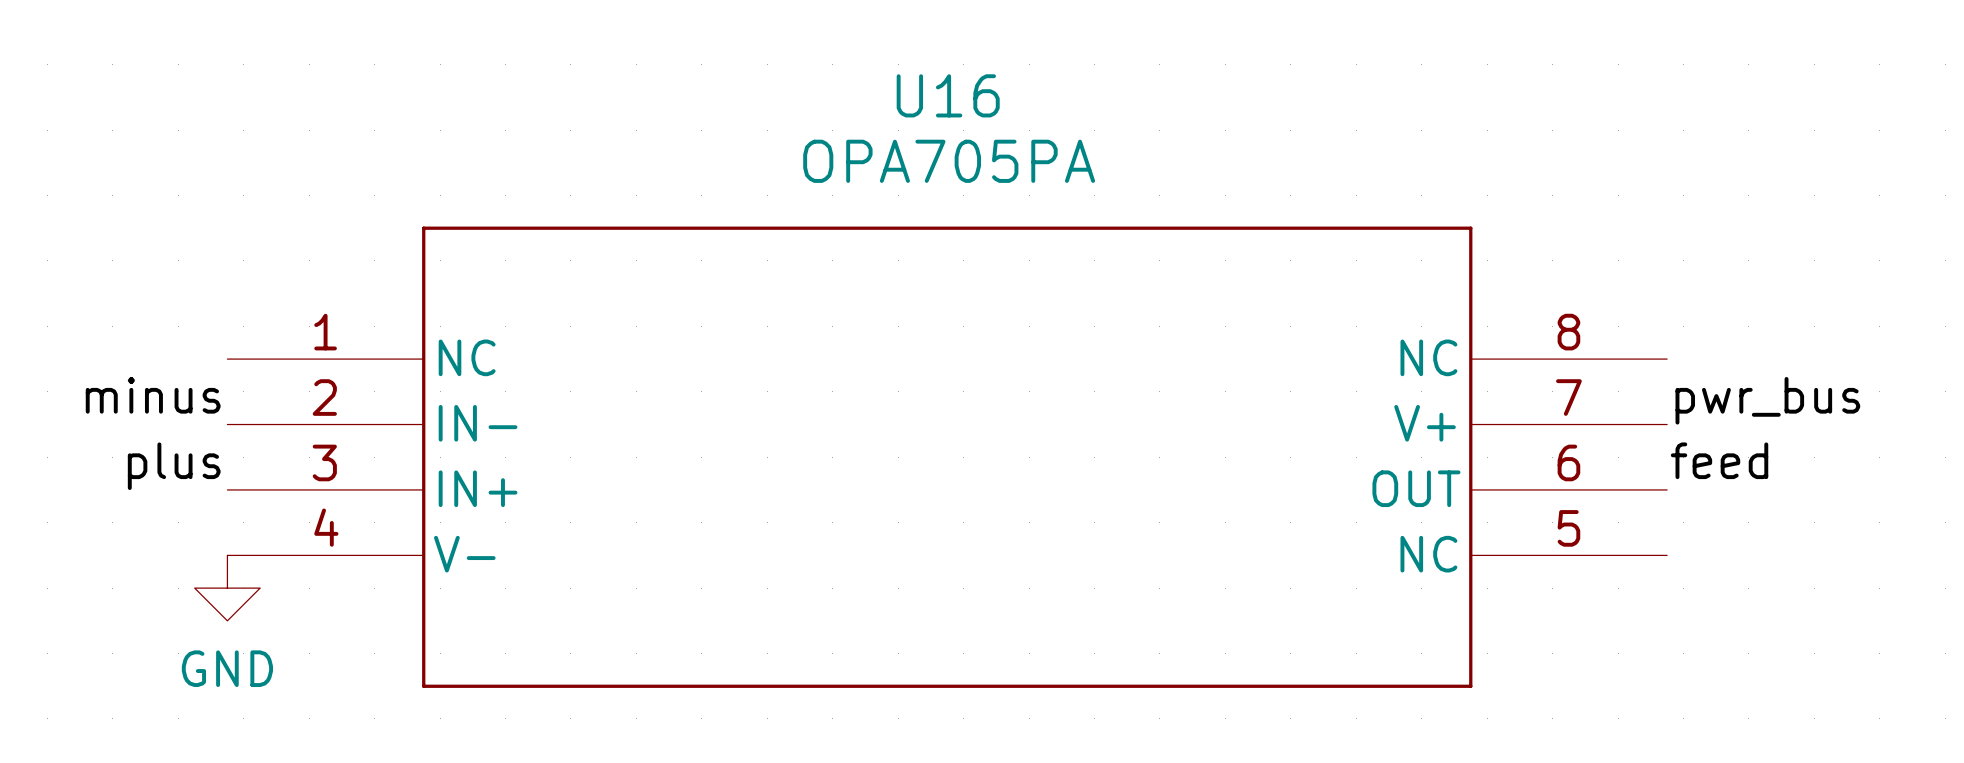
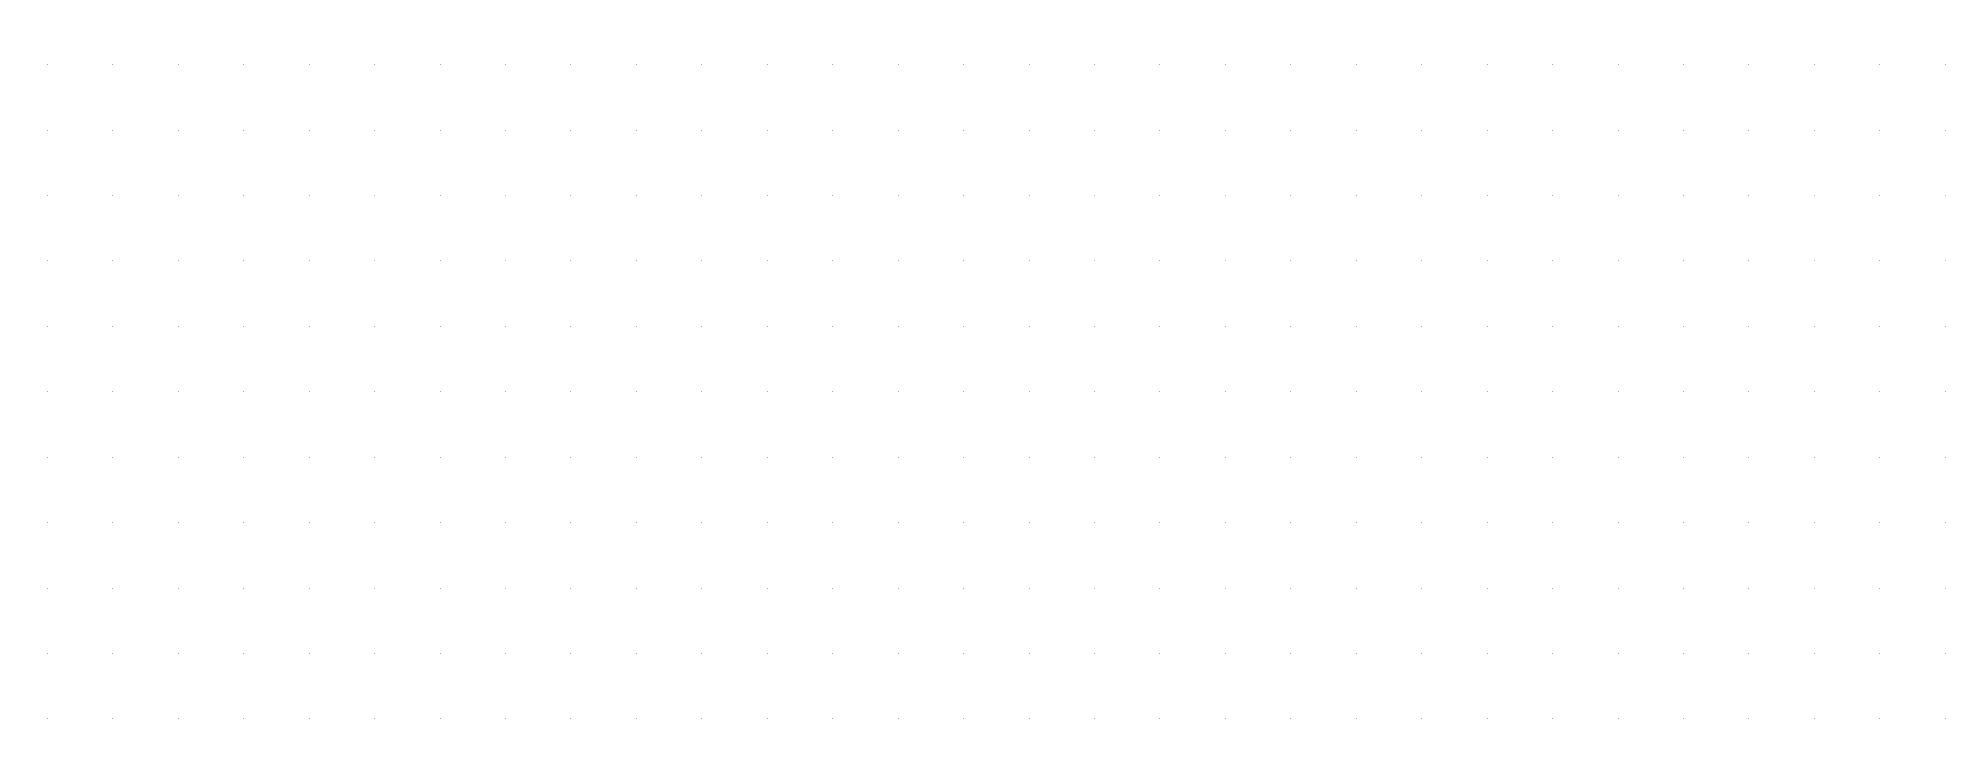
label: minus (153, 395) -> none
label: pwr_bus (1767, 400) -> none
U16: OPA705PA (947, 457) -> none
label: feed (1719, 460) -> none
label: plus (174, 466) -> none
power symbol: GND (227, 588) -> none

